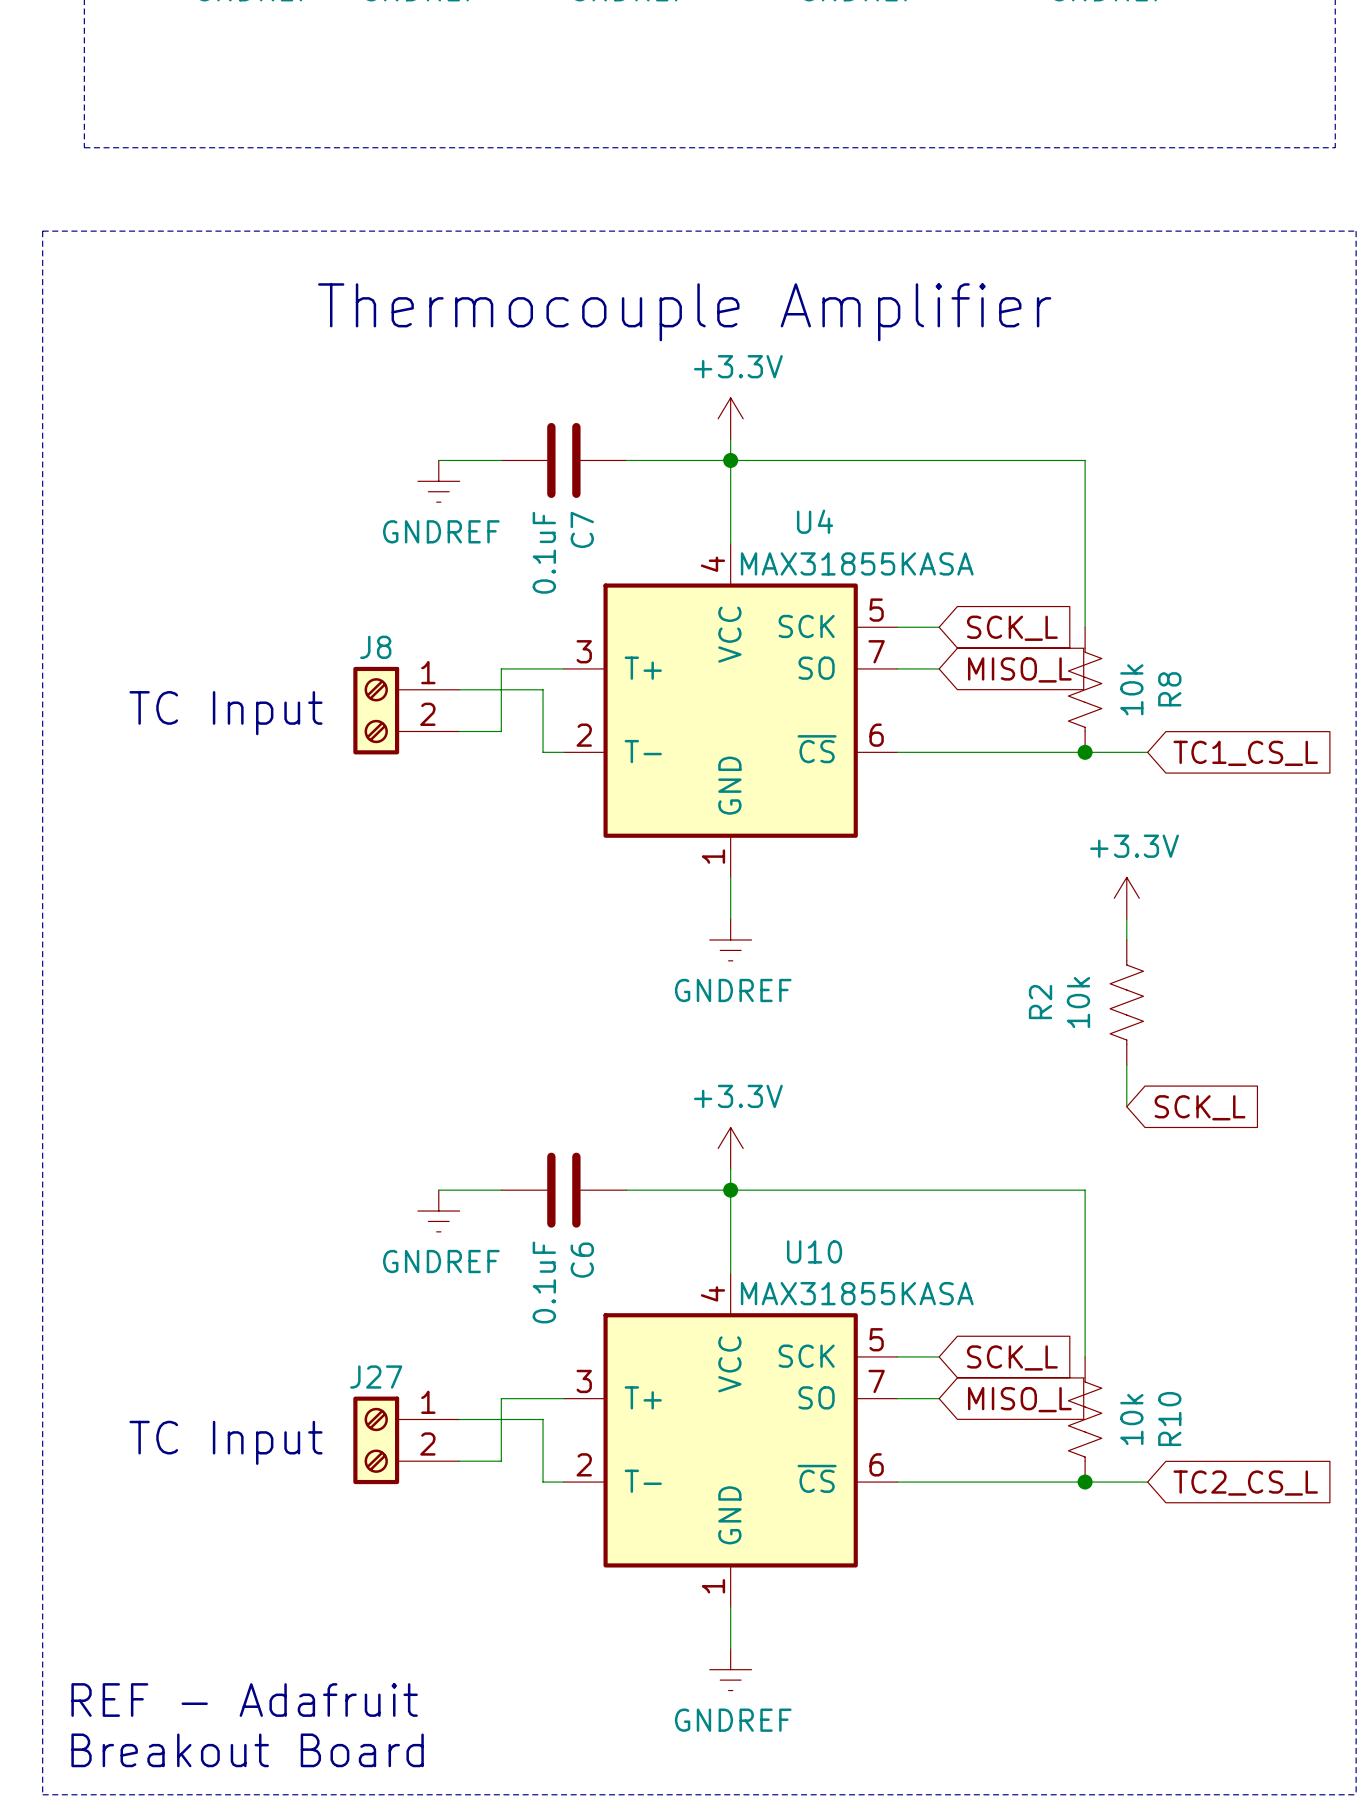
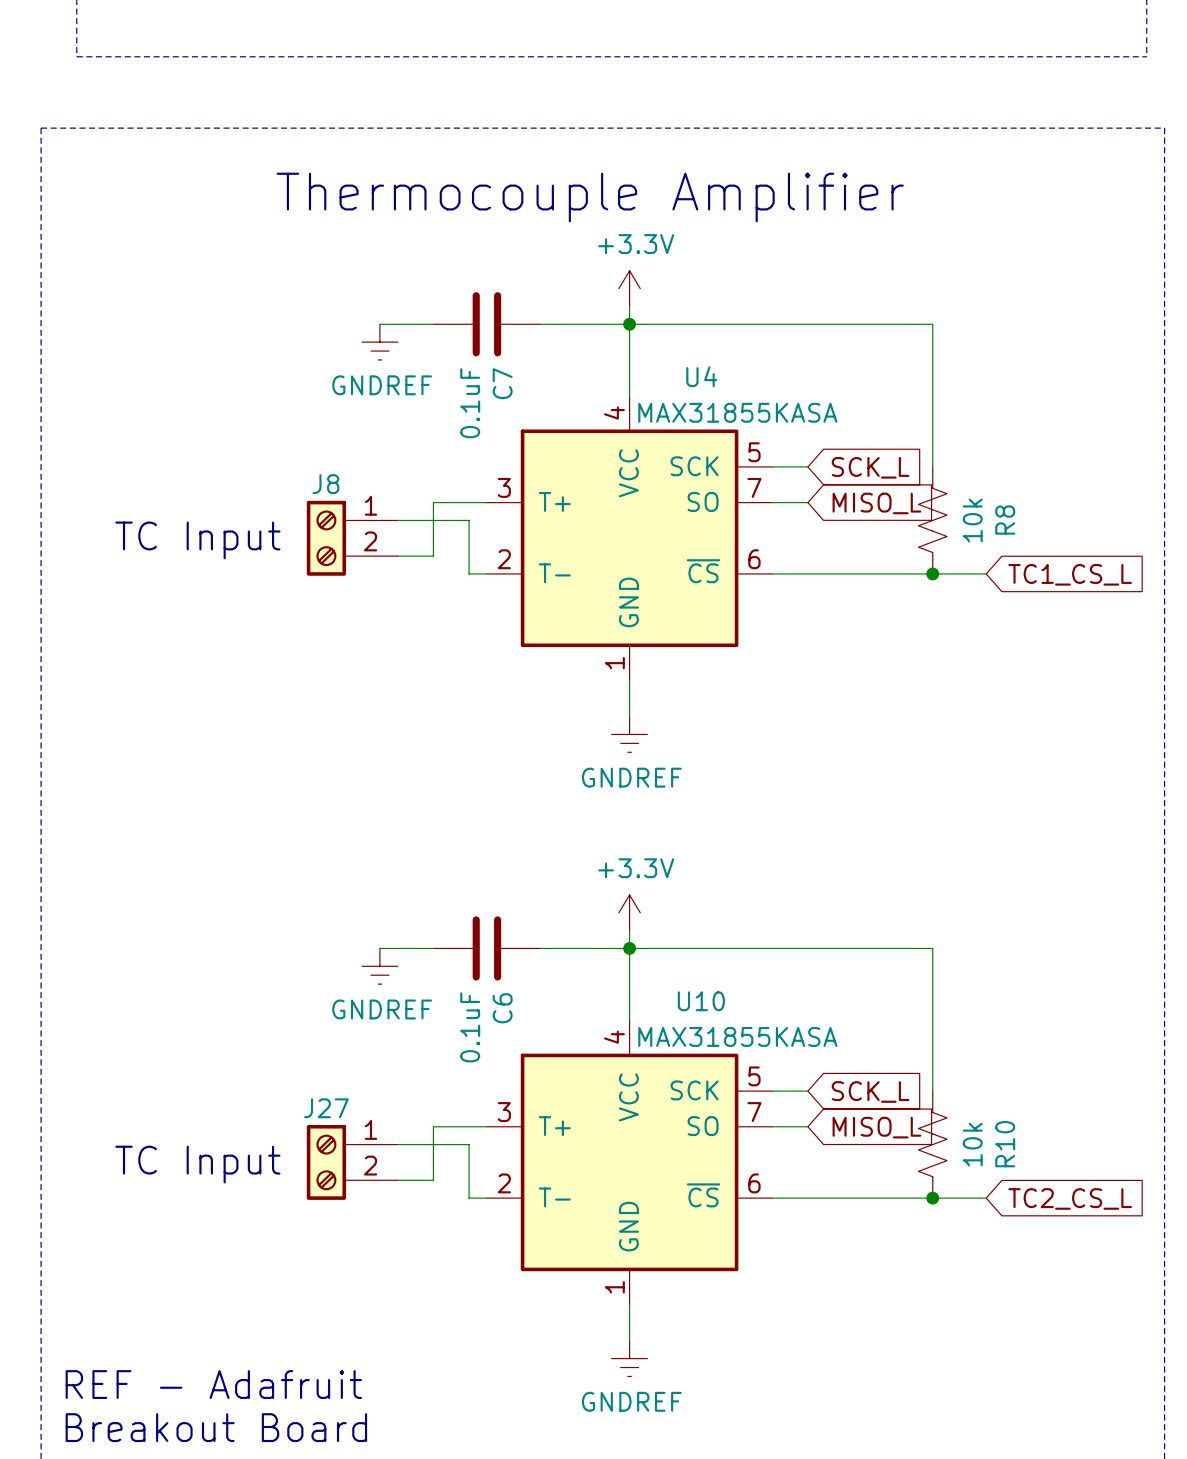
power symbol: +3.3V (1126, 898) -> none
wire: (1126, 919) (1126, 939) -> none
R2: 10k (1126, 1002) -> none
wire: (1126, 1065) (1126, 1106) -> none
global label: SCK_L (1200, 1107) -> none

